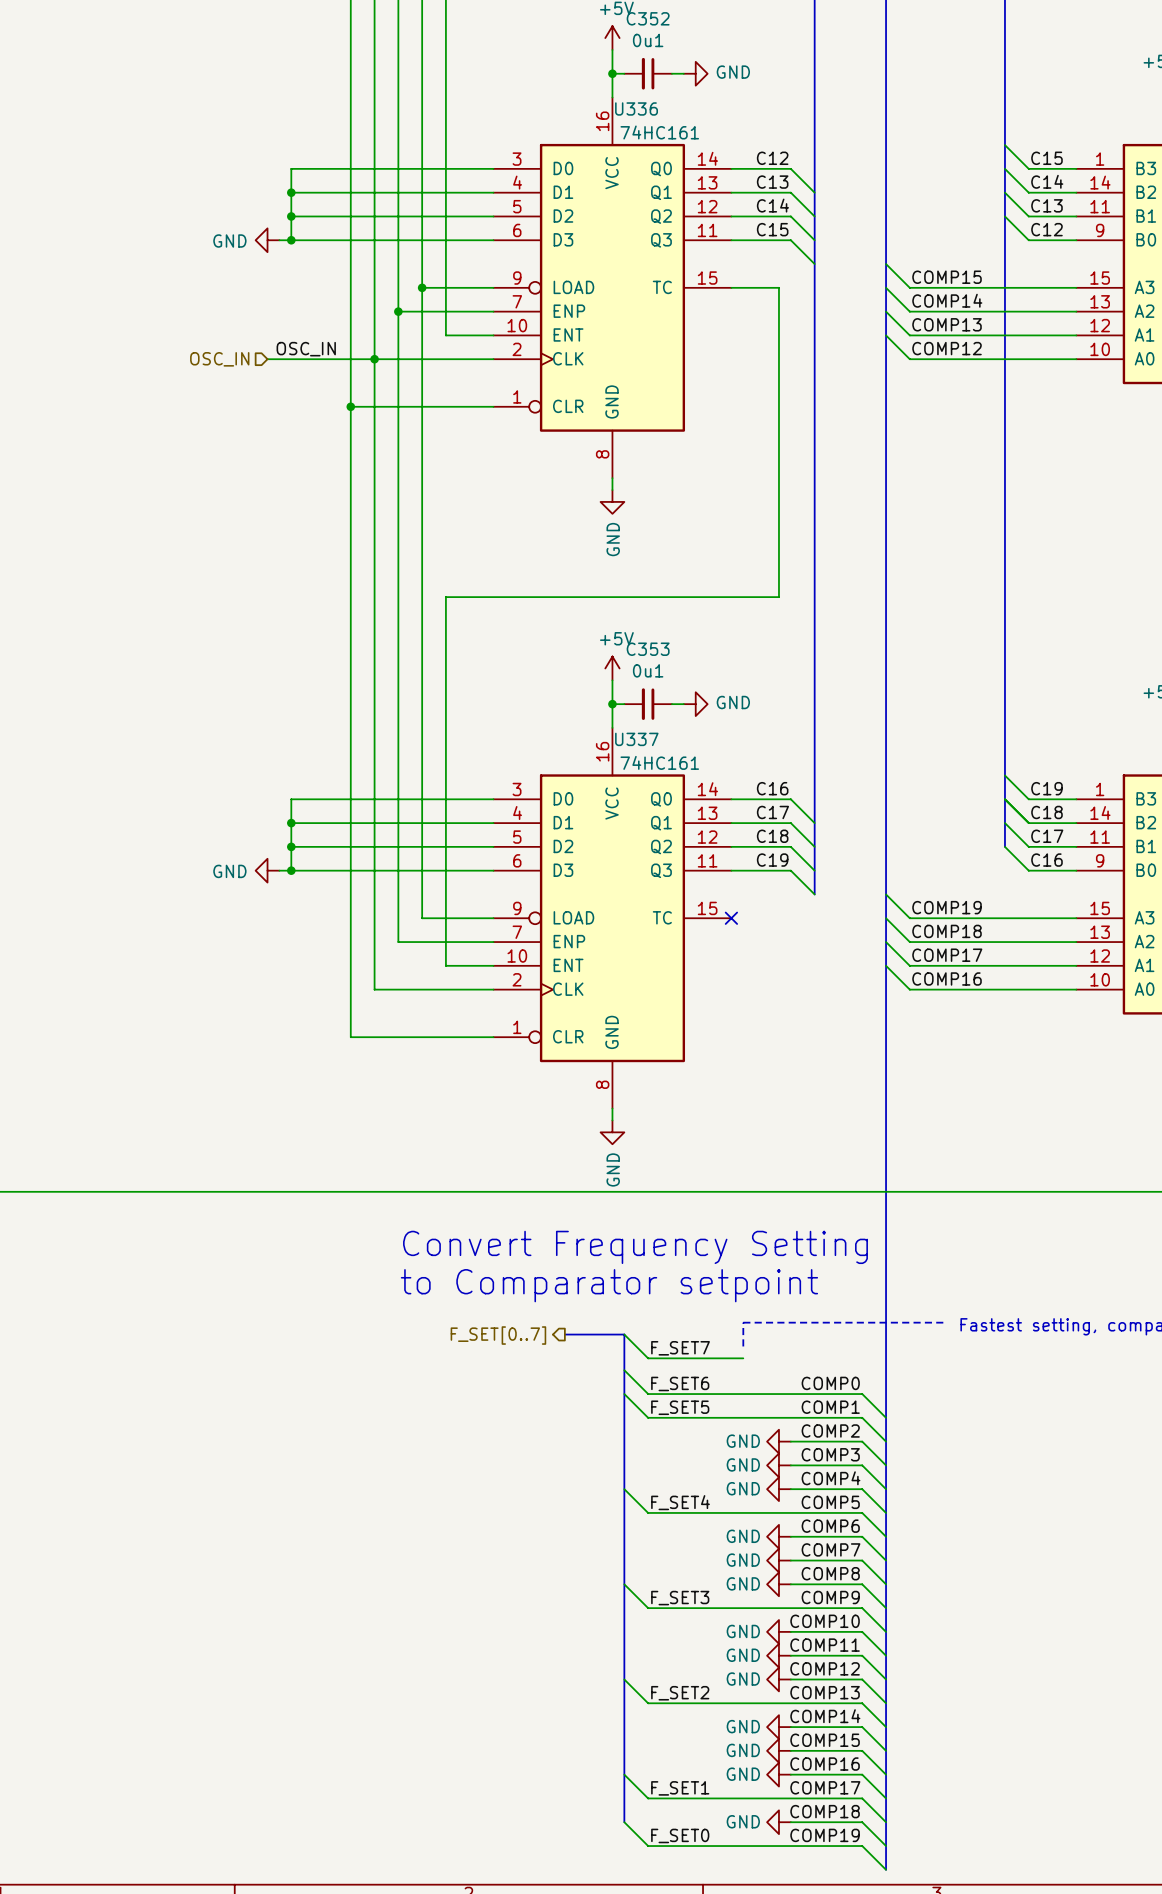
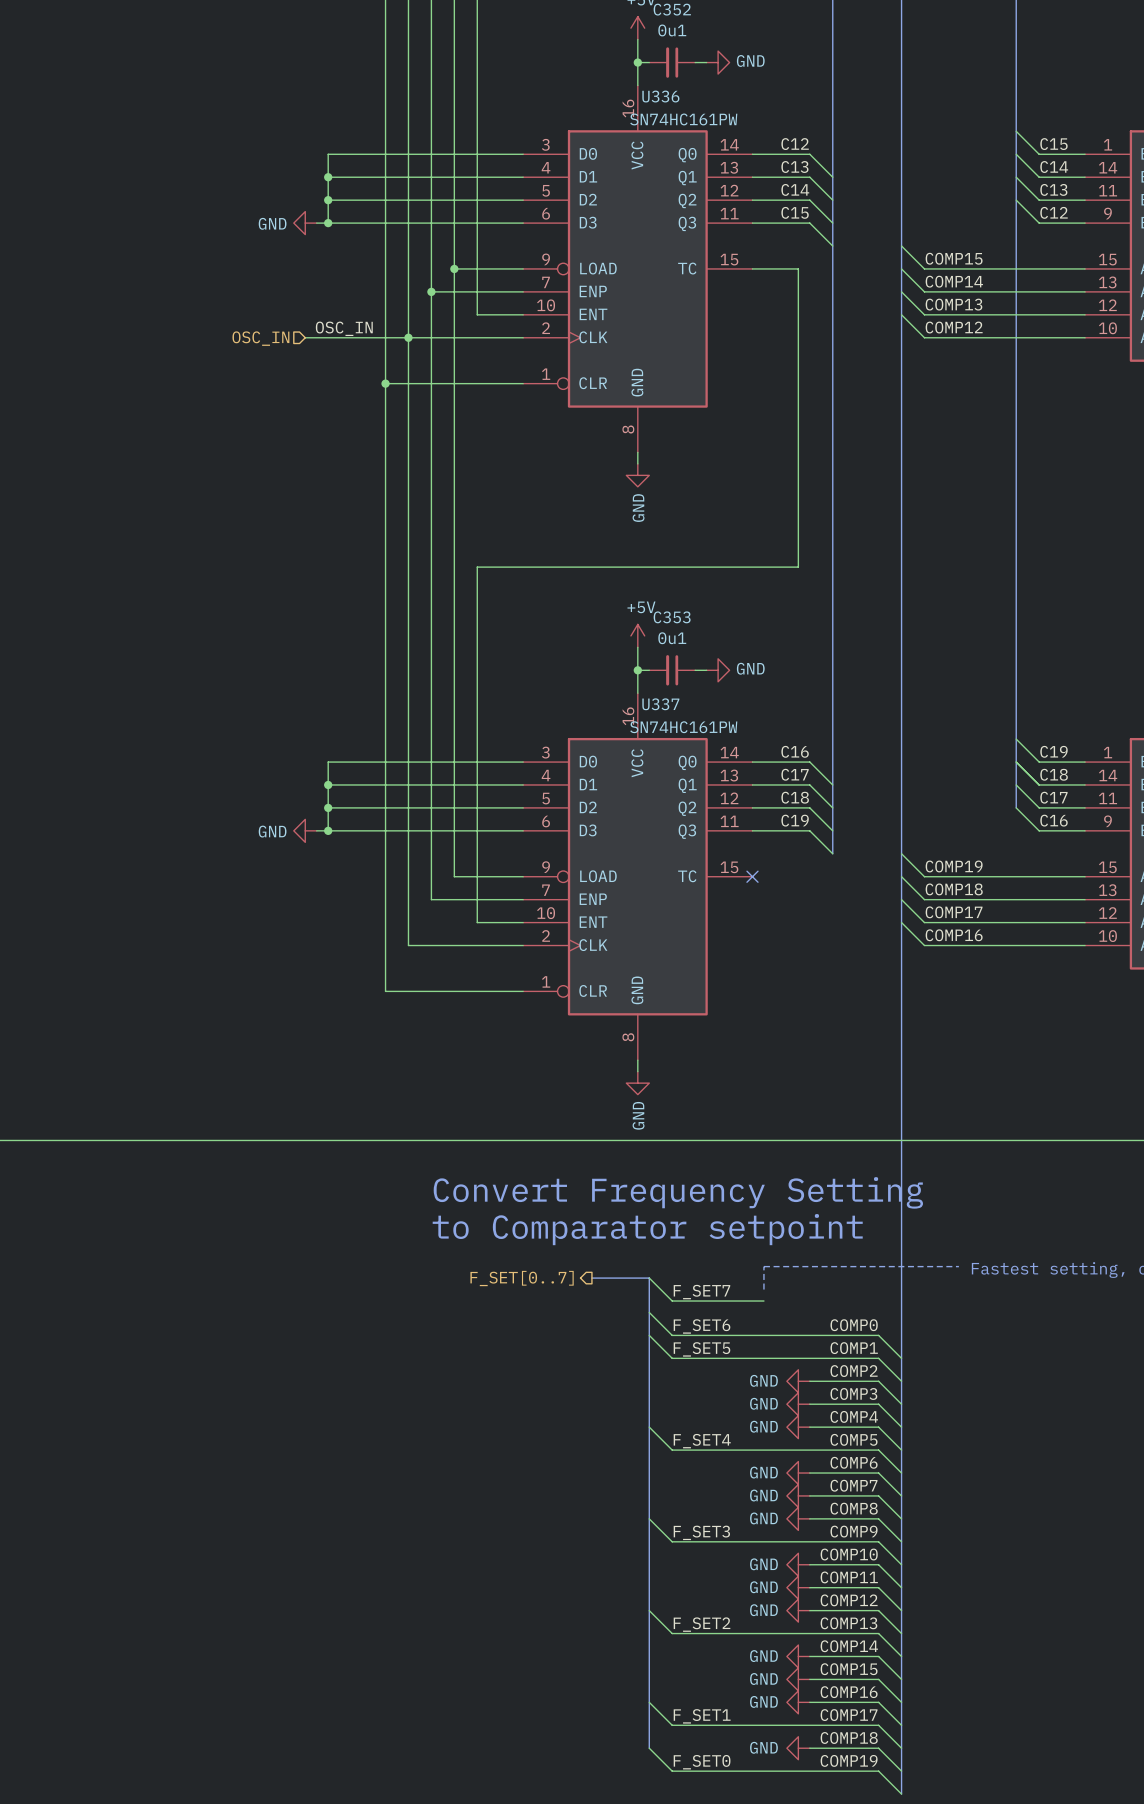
U336 value: 74HC161 (659, 132) -> SN74HC161PW (683, 119)
U337 value: 74HC161 (659, 762) -> SN74HC161PW (683, 727)

